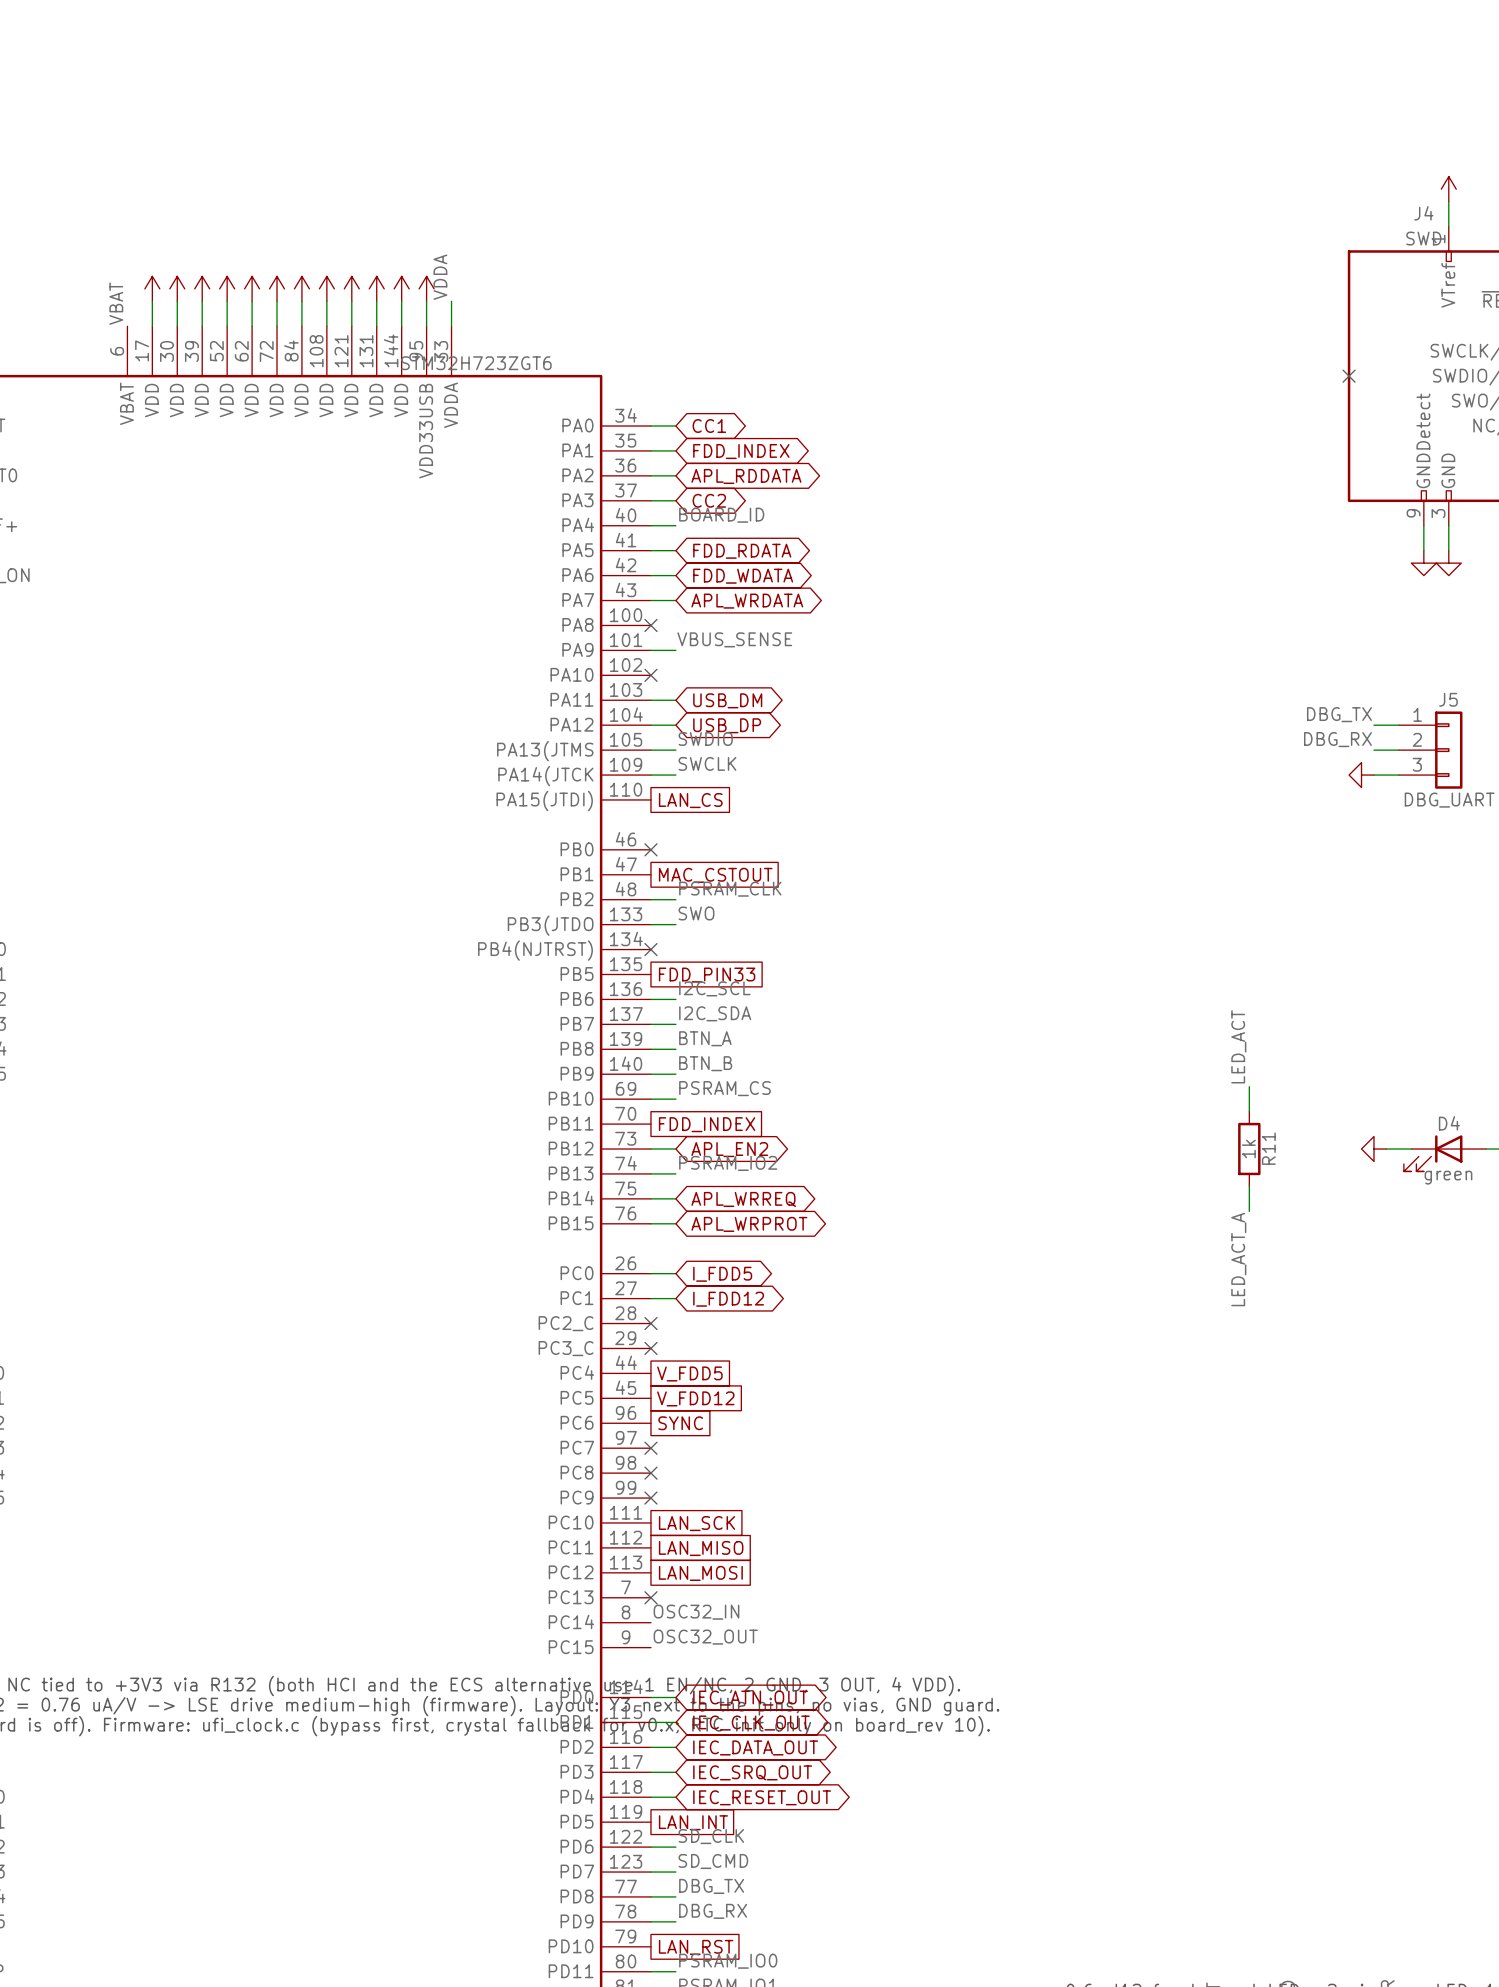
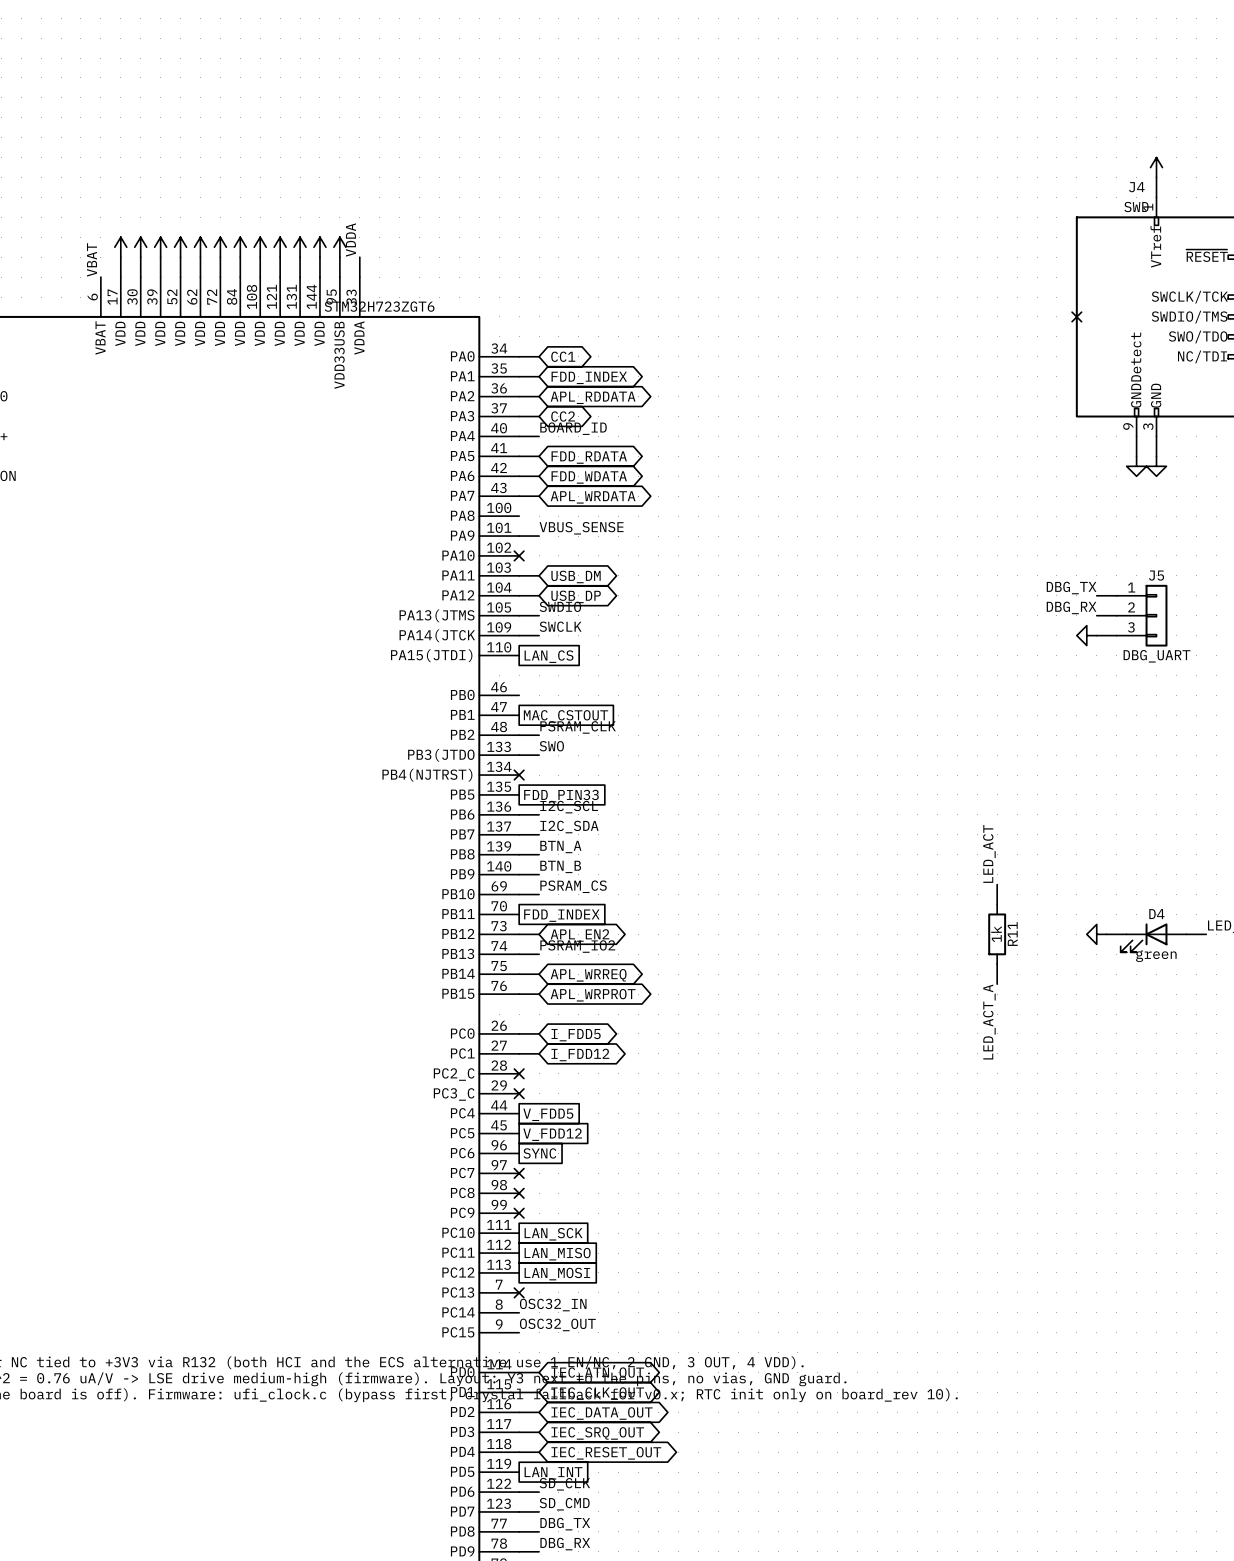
no-connect mark: (650, 625) -> none
no-connect mark: (650, 849) -> none

